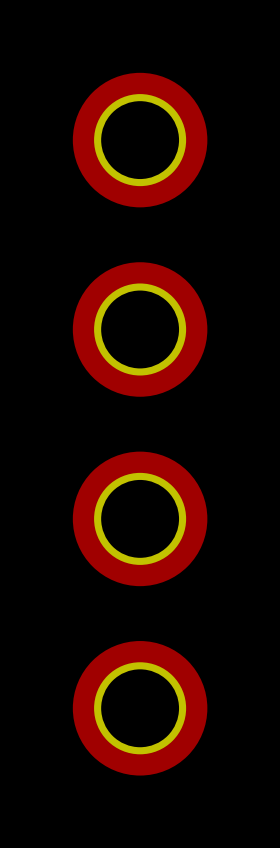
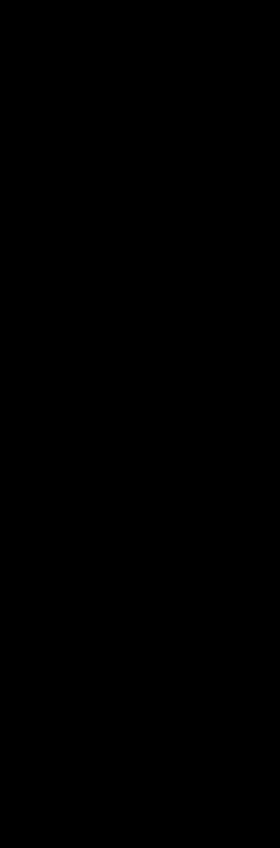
part: (140, 140) -> none
part: (140, 329) -> none
part: (140, 518) -> none
part: (140, 708) -> none

